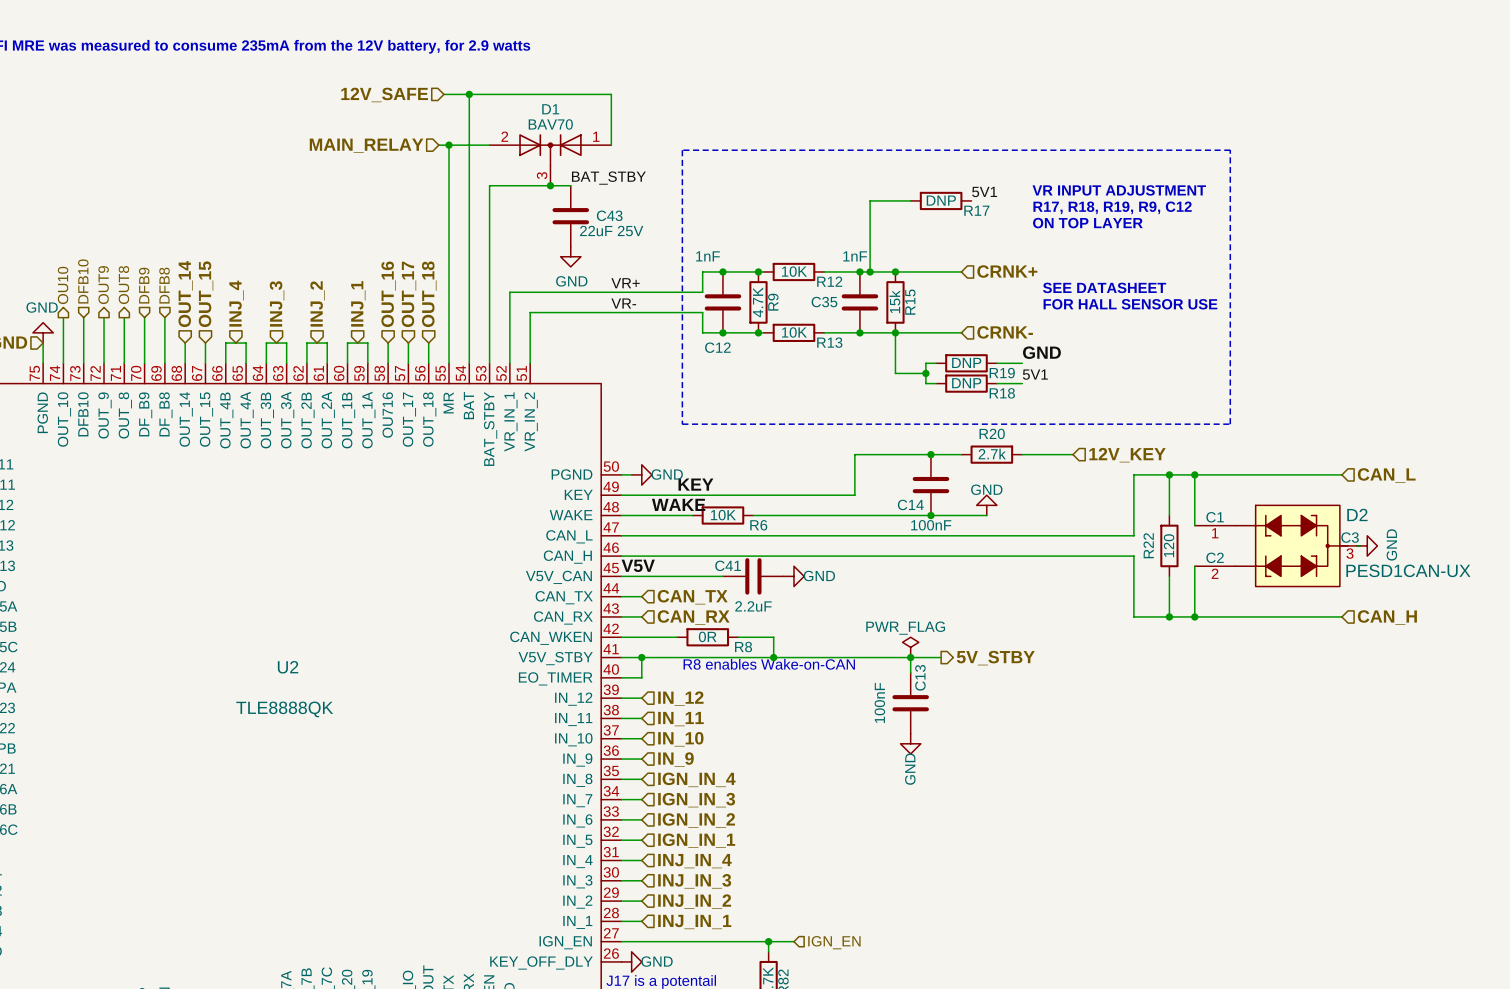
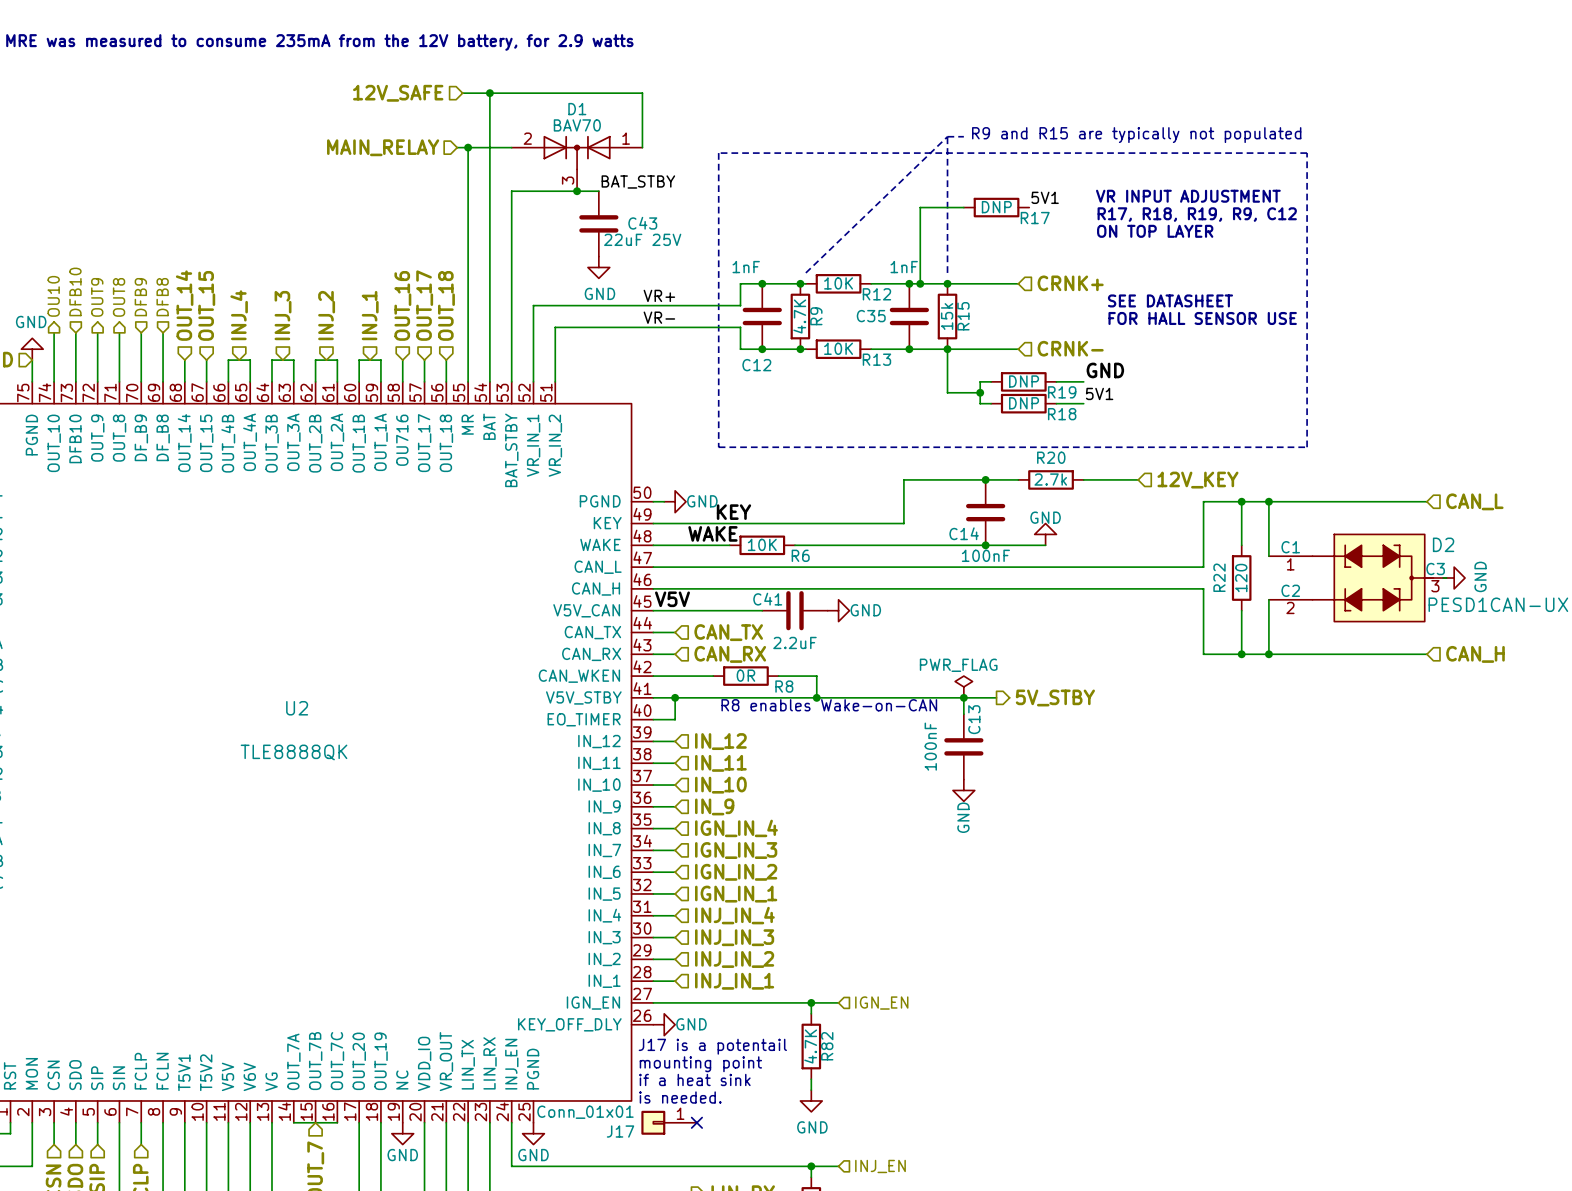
text: none -> R9 and R15 are typically not populated (1136, 135)
line: none -> (947, 136) (805, 272)
line: none -> (947, 136) (947, 272)
line: none -> (947, 136) (963, 136)

